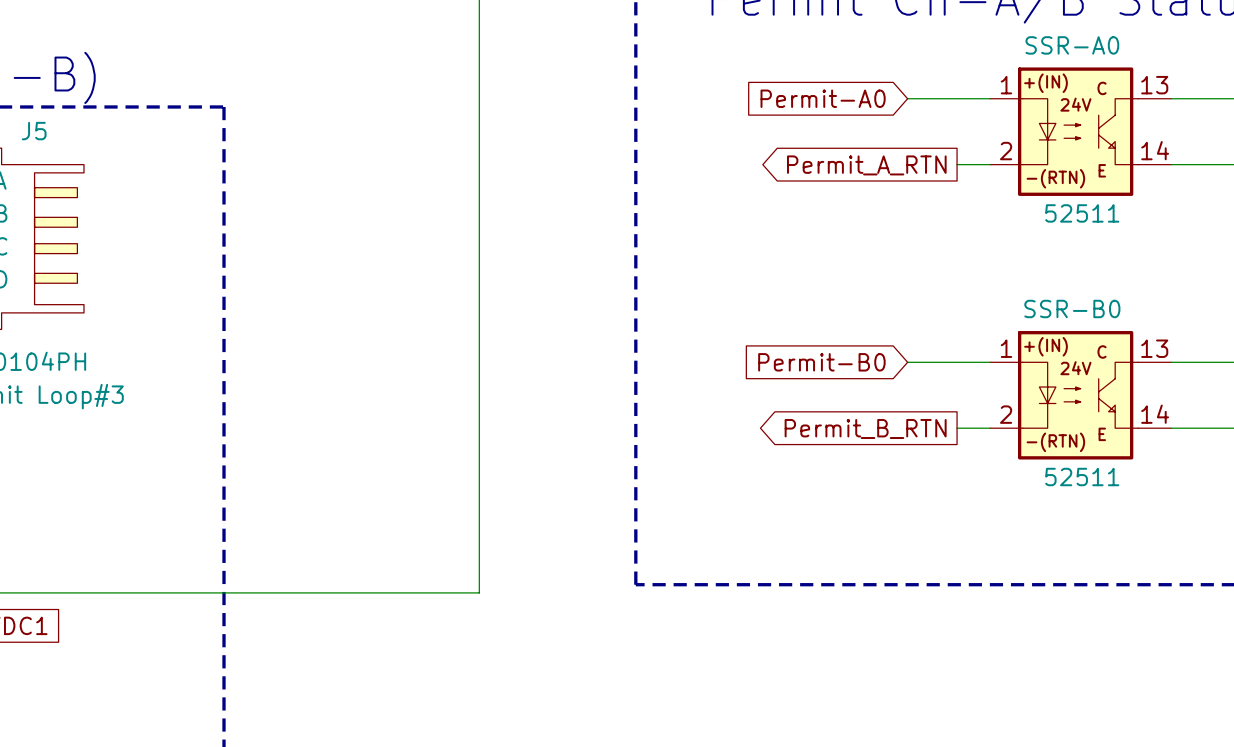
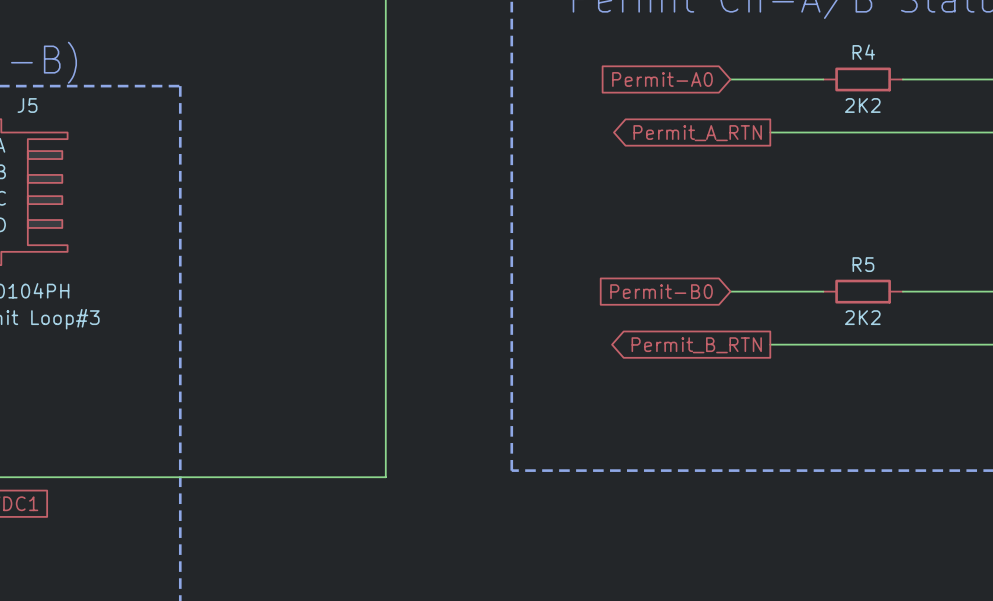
R4: none -> 2K2 (863, 79)
SSR-A0: 52511 (1080, 131) -> none
R5: none -> 2K2 (863, 291)
SSR-B0: 52511 (1080, 395) -> none

